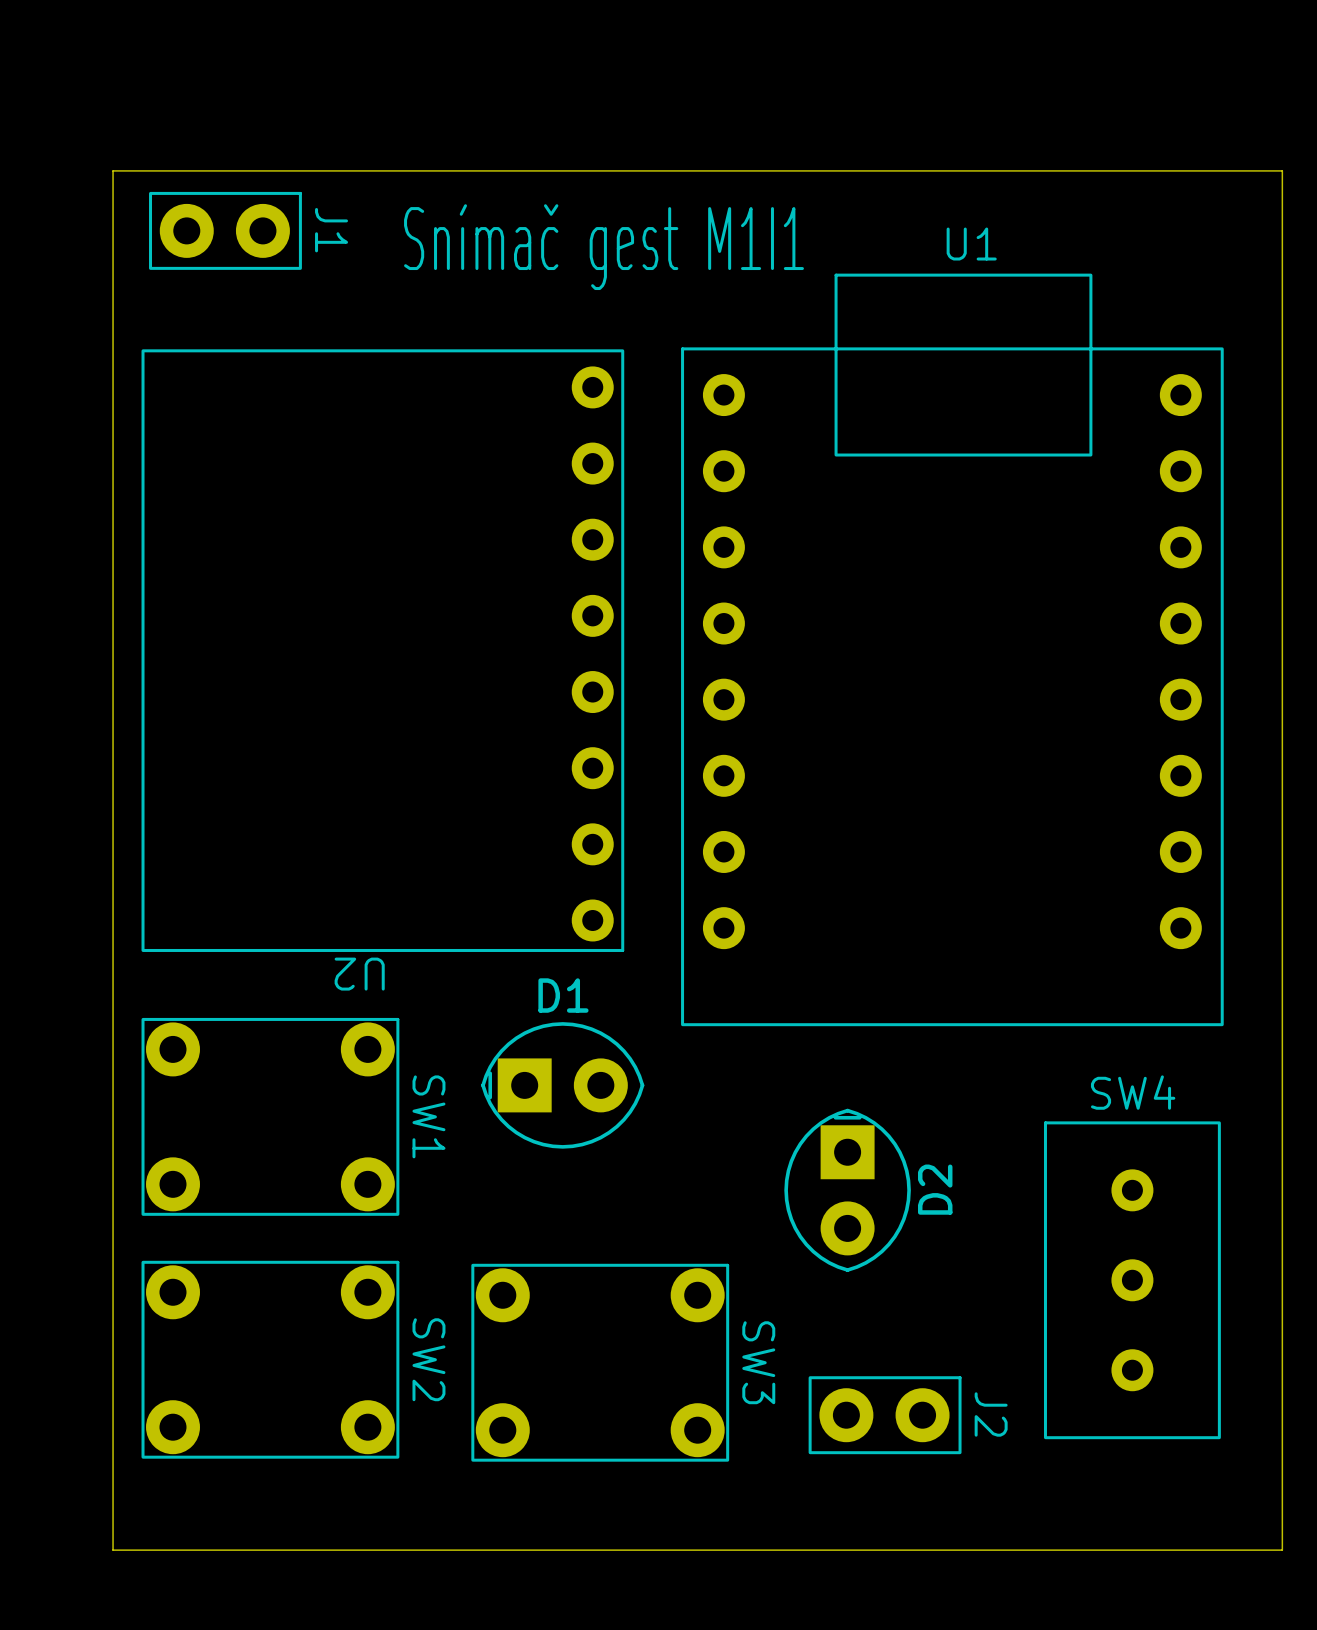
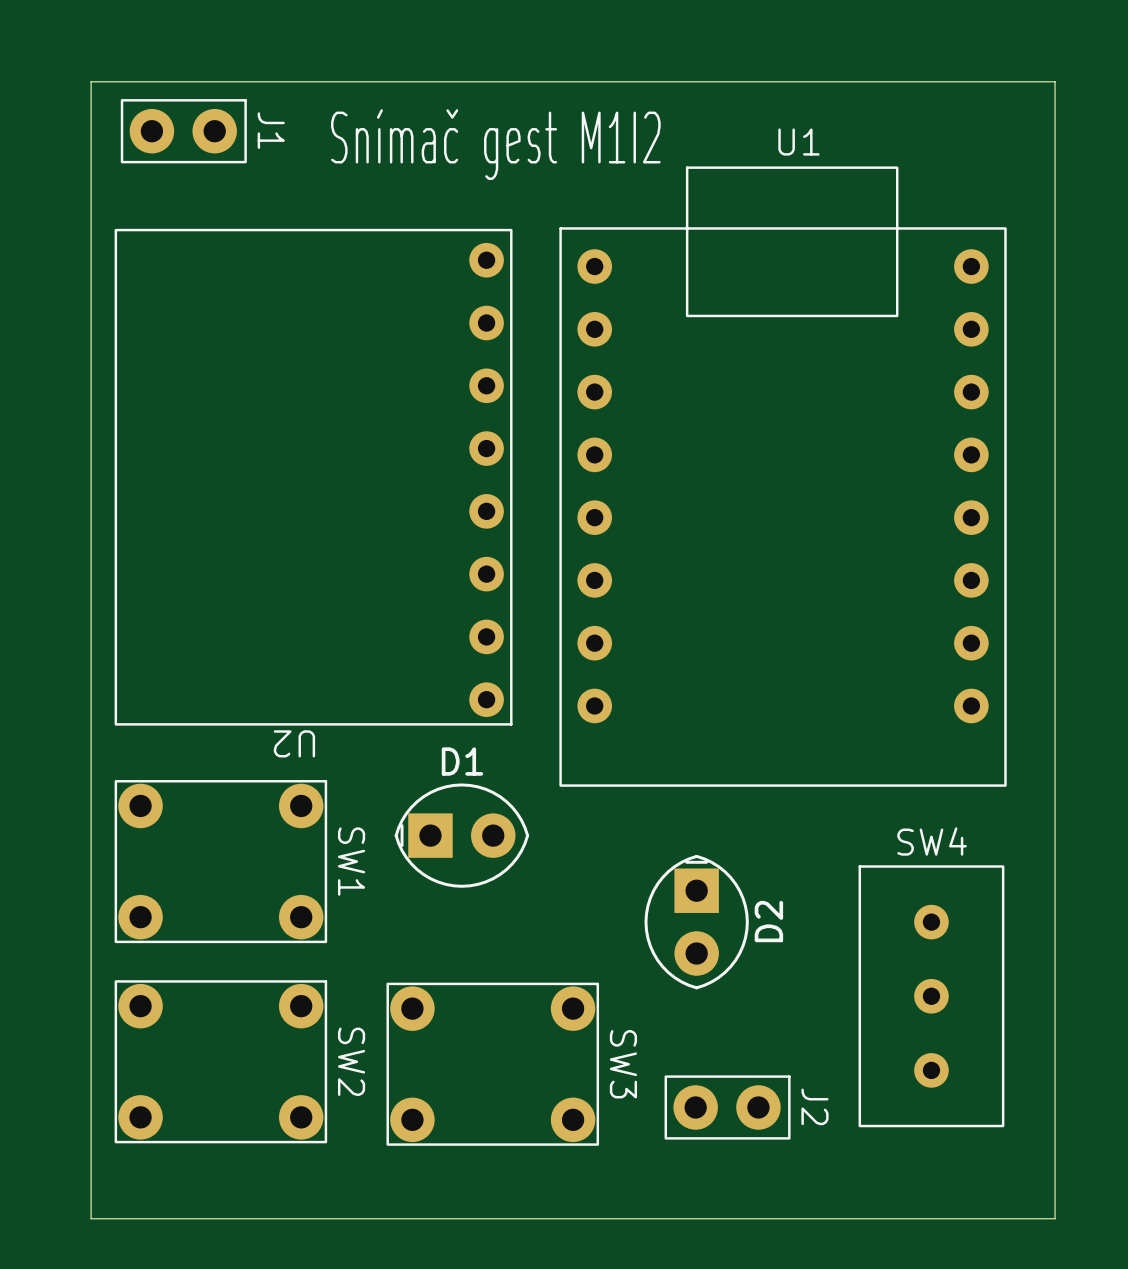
text: Snímač gest M1I1 (604, 247) -> Snímač gest M1I2 (495, 144)

